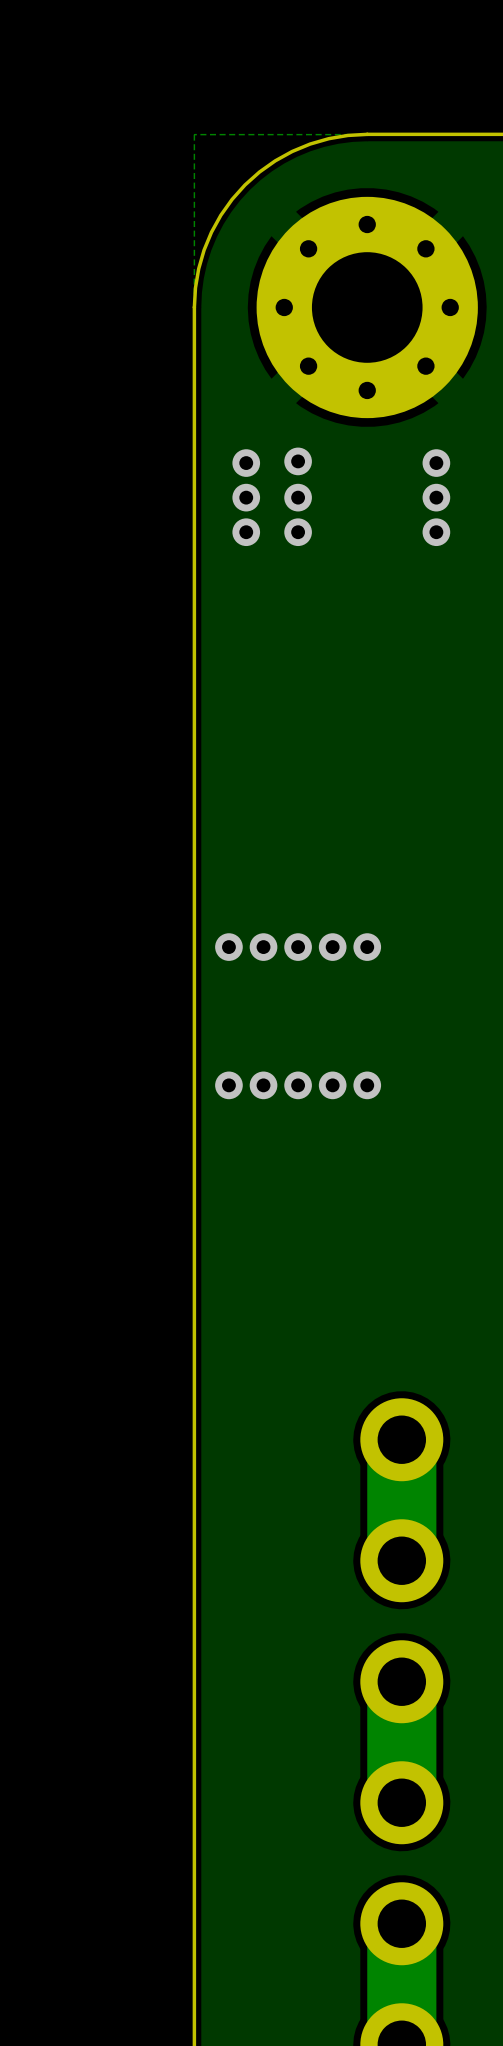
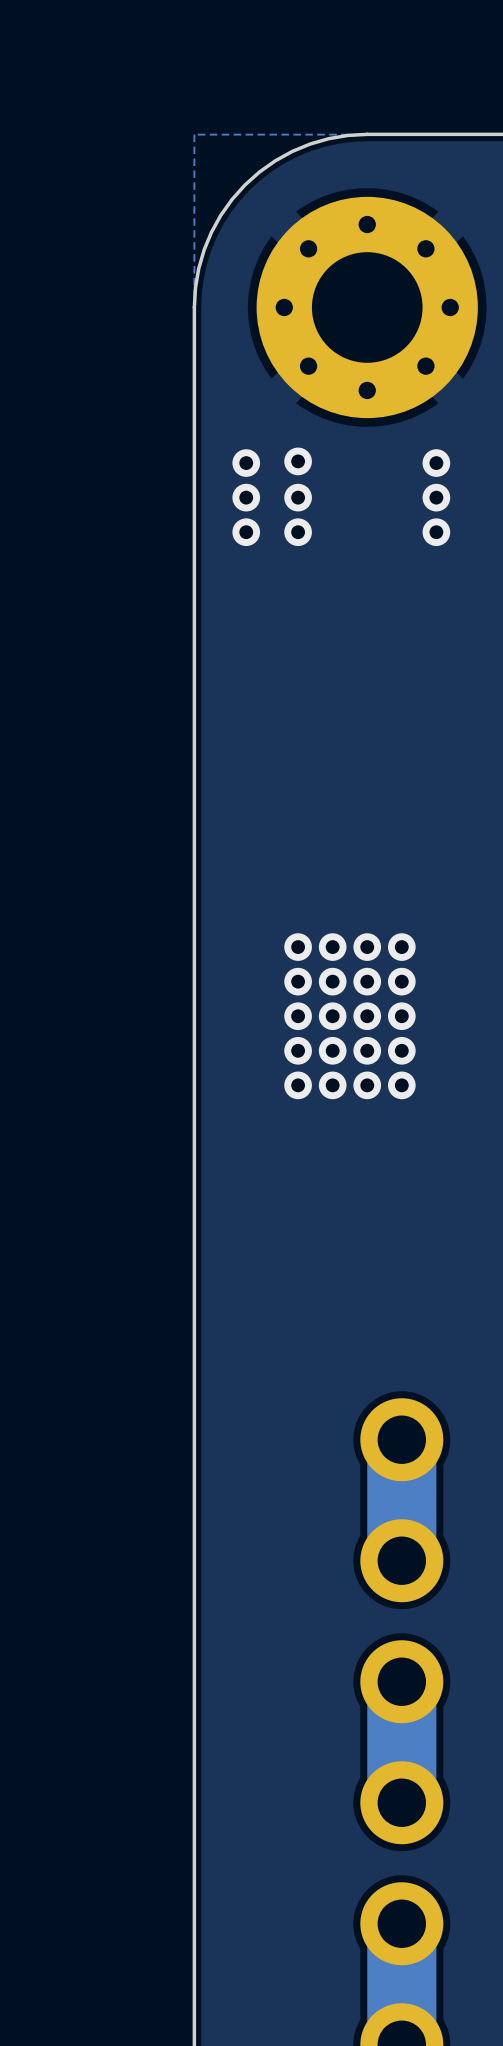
via: (228, 947) -> none
via: (263, 947) -> none
via: none -> (401, 947)
via: none -> (298, 981)
via: none -> (332, 981)
via: none -> (367, 981)
via: none -> (401, 981)
via: none -> (298, 1016)
via: none -> (332, 1016)
via: none -> (367, 1016)
via: none -> (401, 1016)
via: none -> (298, 1050)
via: none -> (332, 1050)
via: none -> (367, 1050)
via: none -> (401, 1050)
via: (228, 1085) -> none
via: (263, 1085) -> none
via: none -> (401, 1085)

